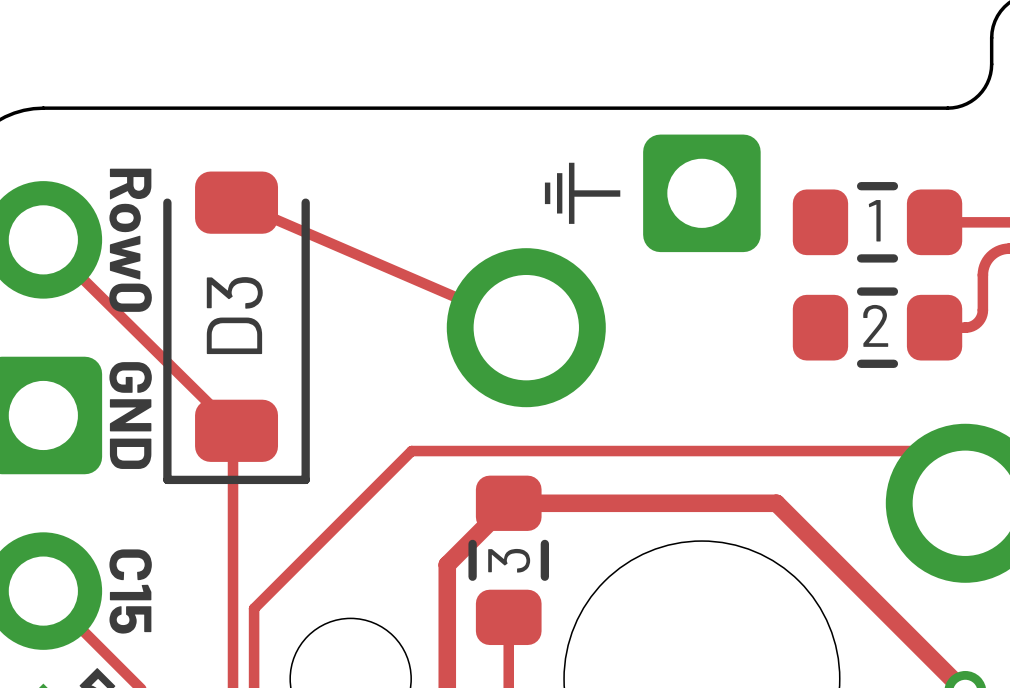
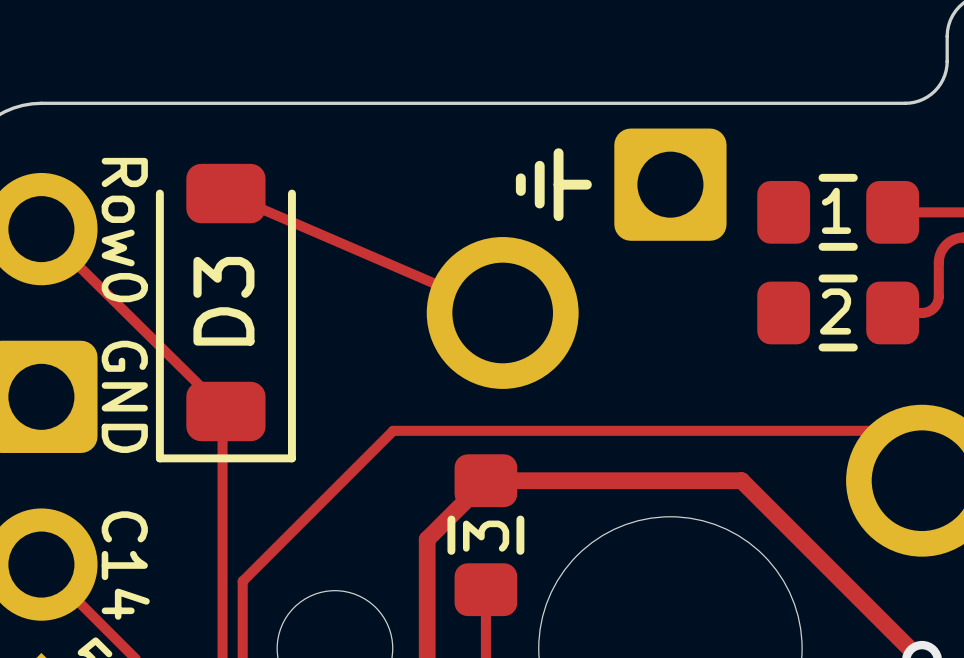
part text: C15 (130, 591) -> C14 (125, 565)

